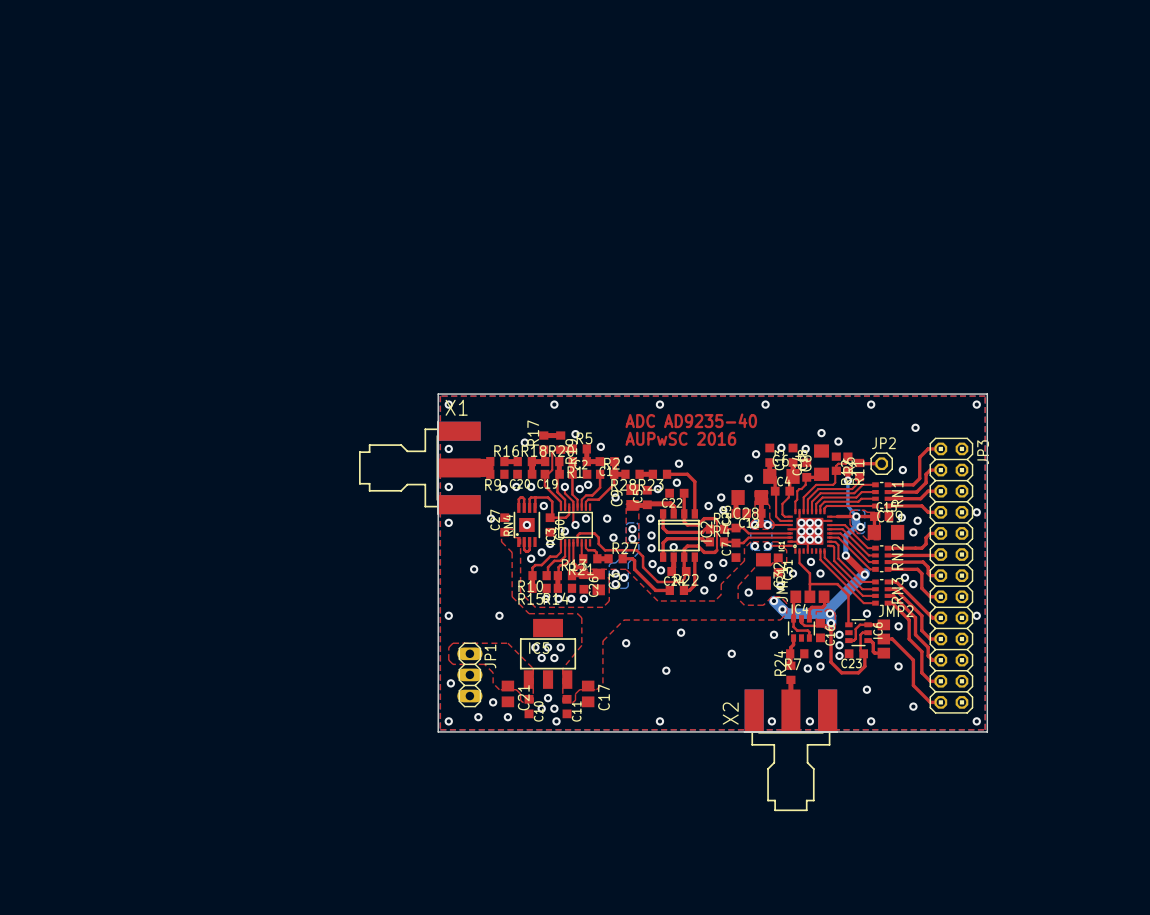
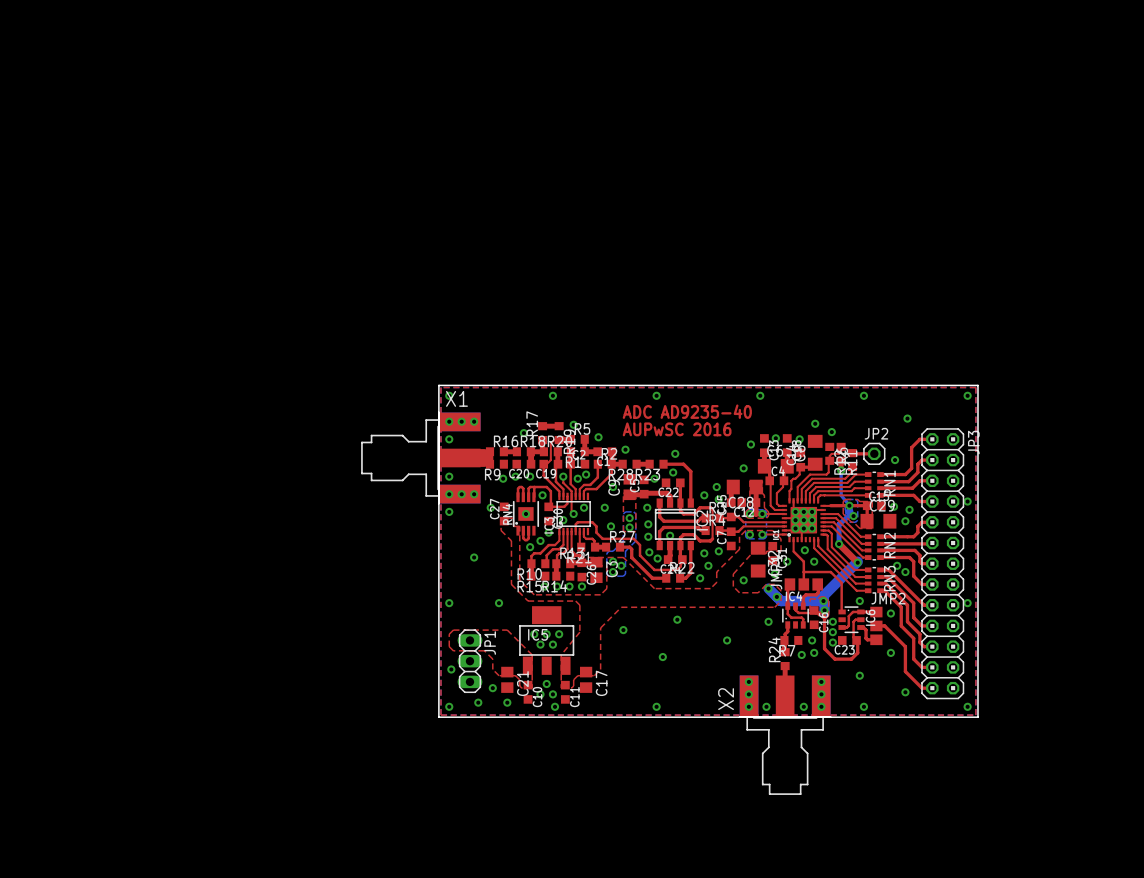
via: none -> (449, 421)
via: none -> (461, 421)
via: none -> (474, 421)
via: none -> (449, 494)
via: none -> (461, 494)
via: none -> (474, 494)
via: none -> (748, 681)
via: none -> (821, 681)
via: none -> (748, 694)
via: none -> (821, 694)
via: none -> (748, 706)
via: none -> (821, 706)

